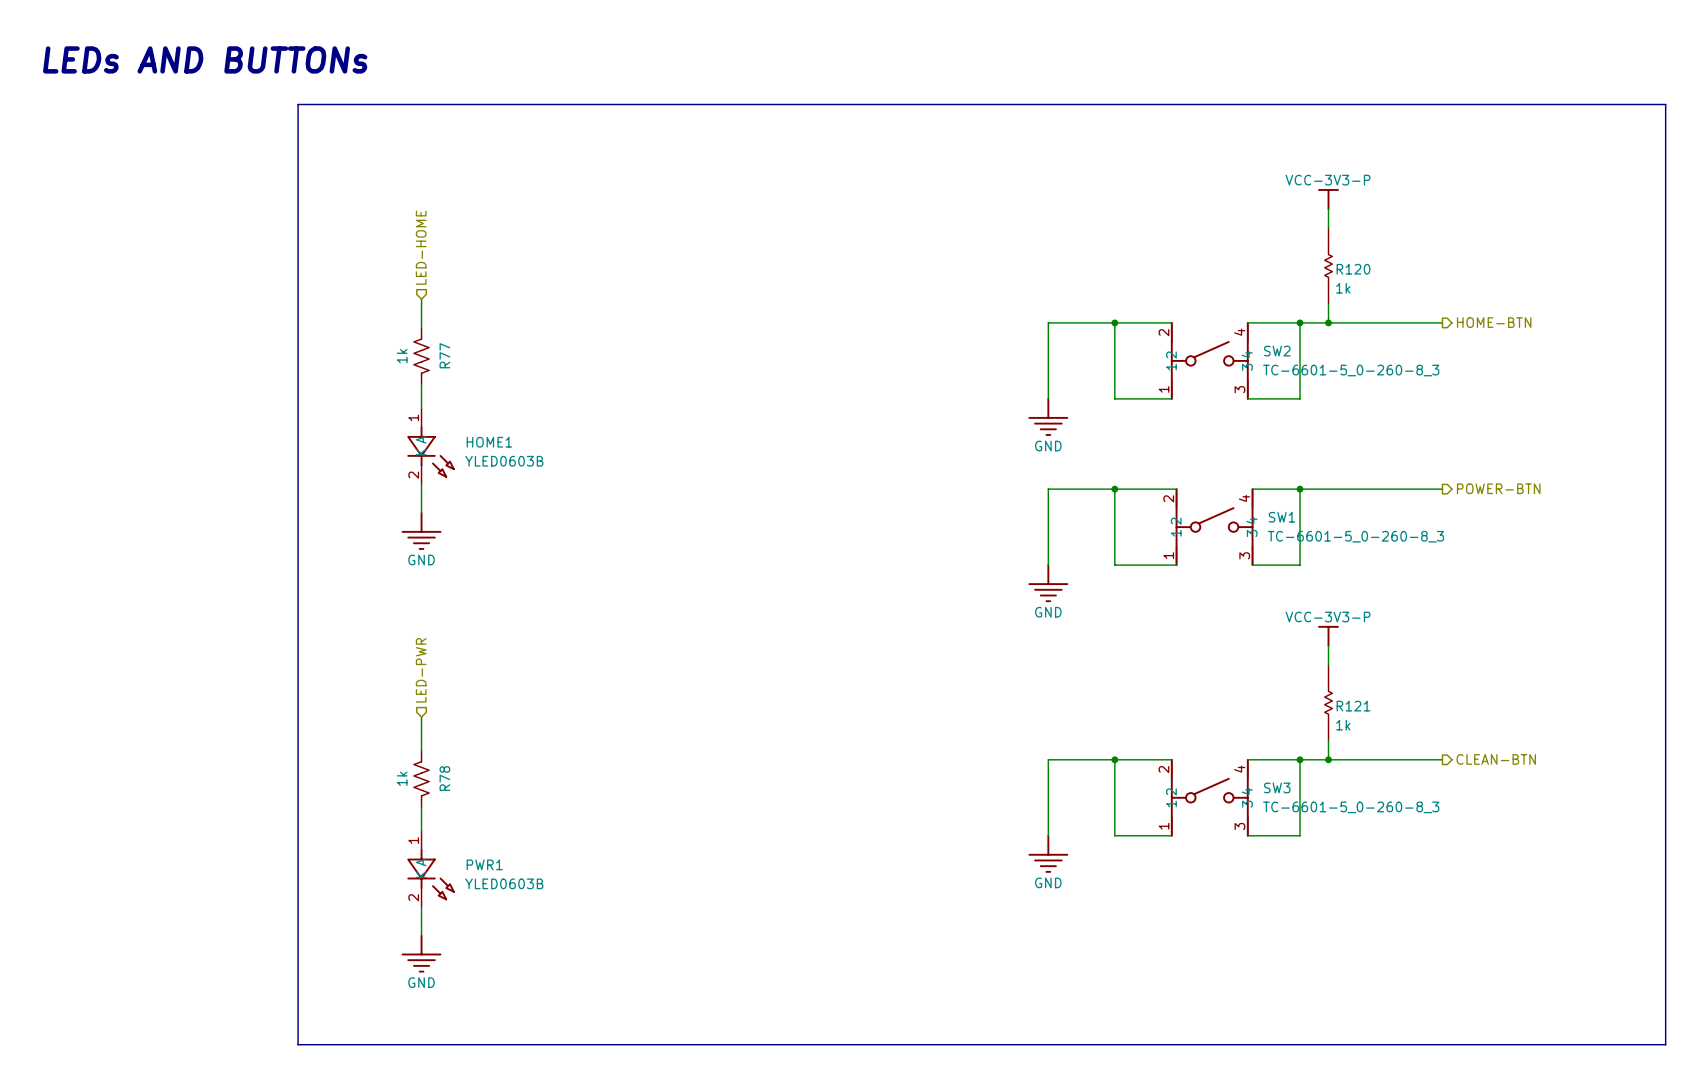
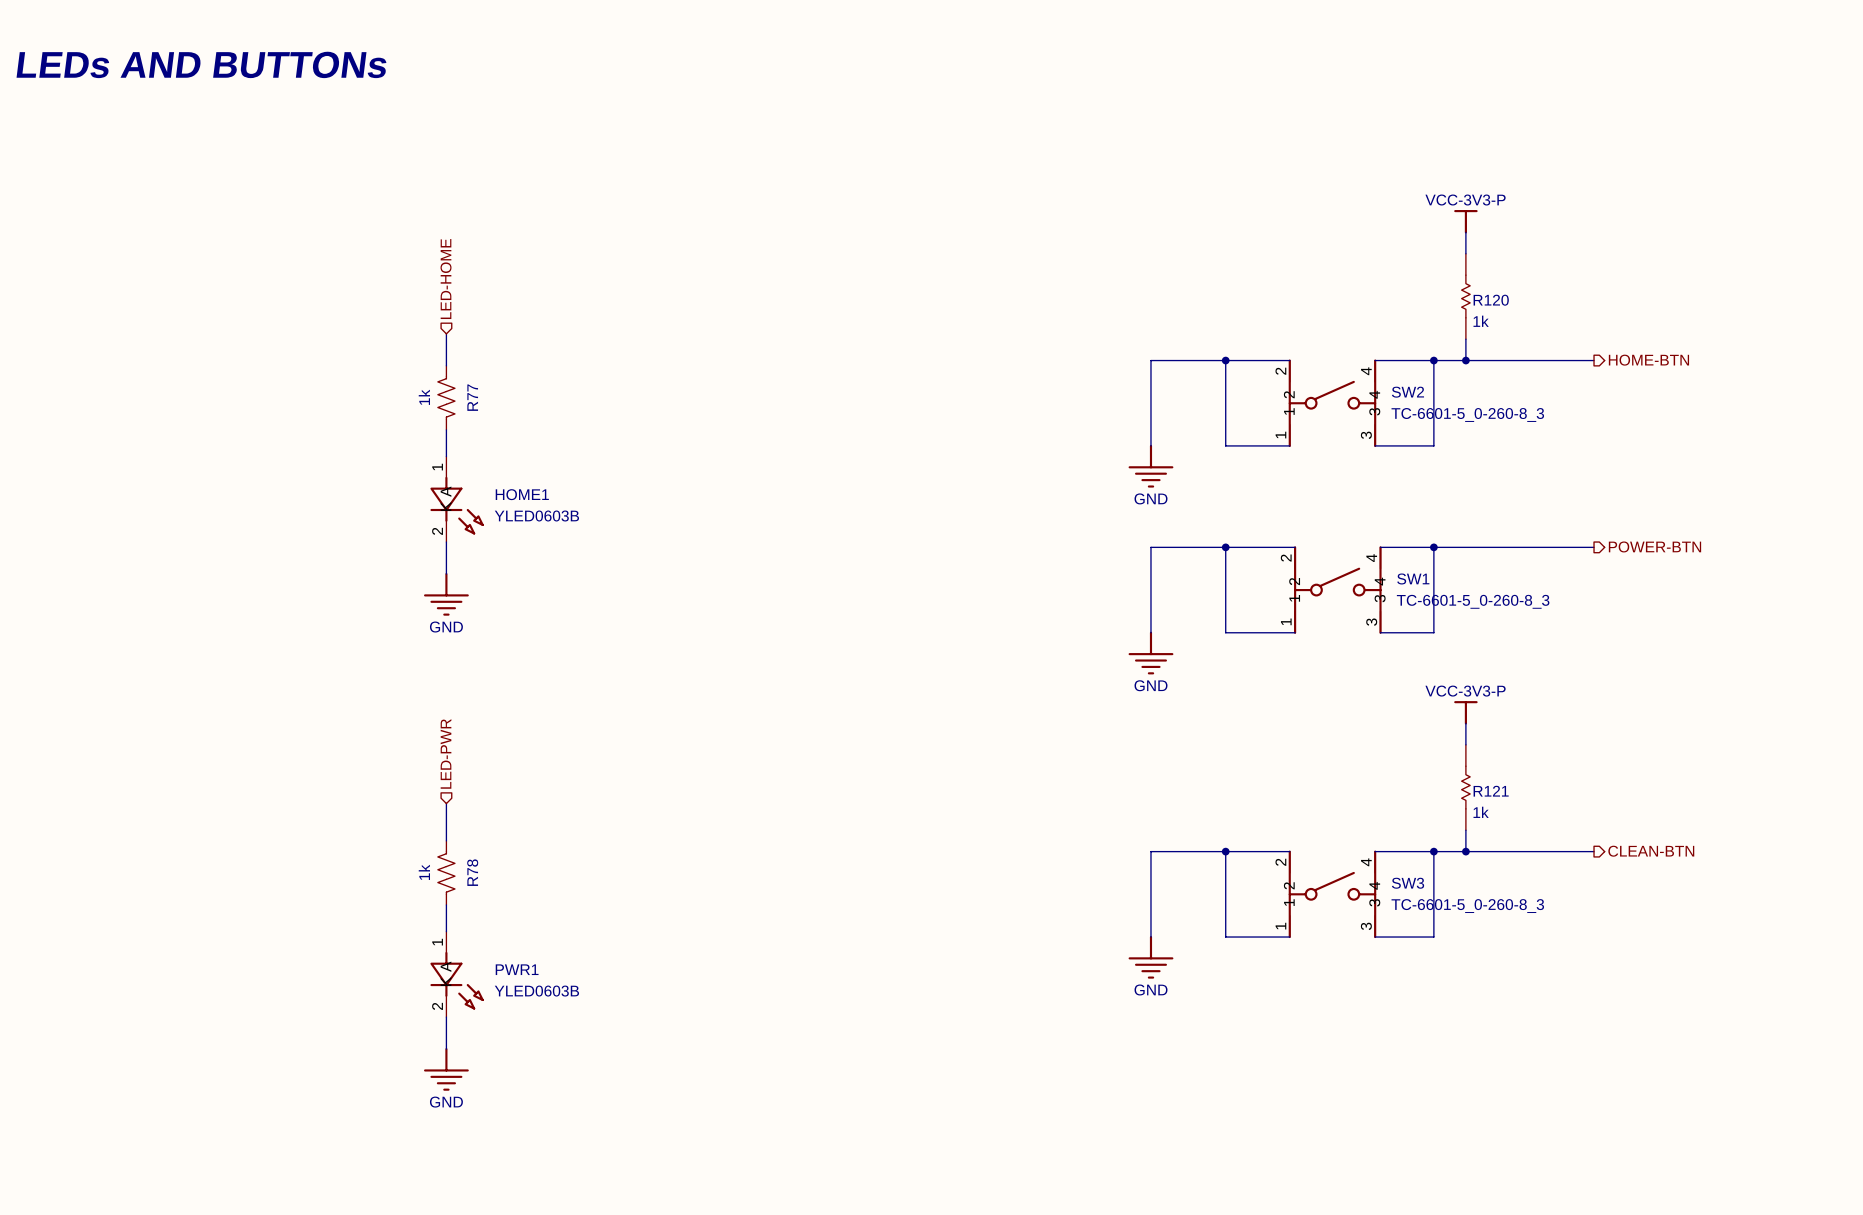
line: (298, 104) (1665, 104) (1665, 1044) (298, 1044) (298, 104) -> none

